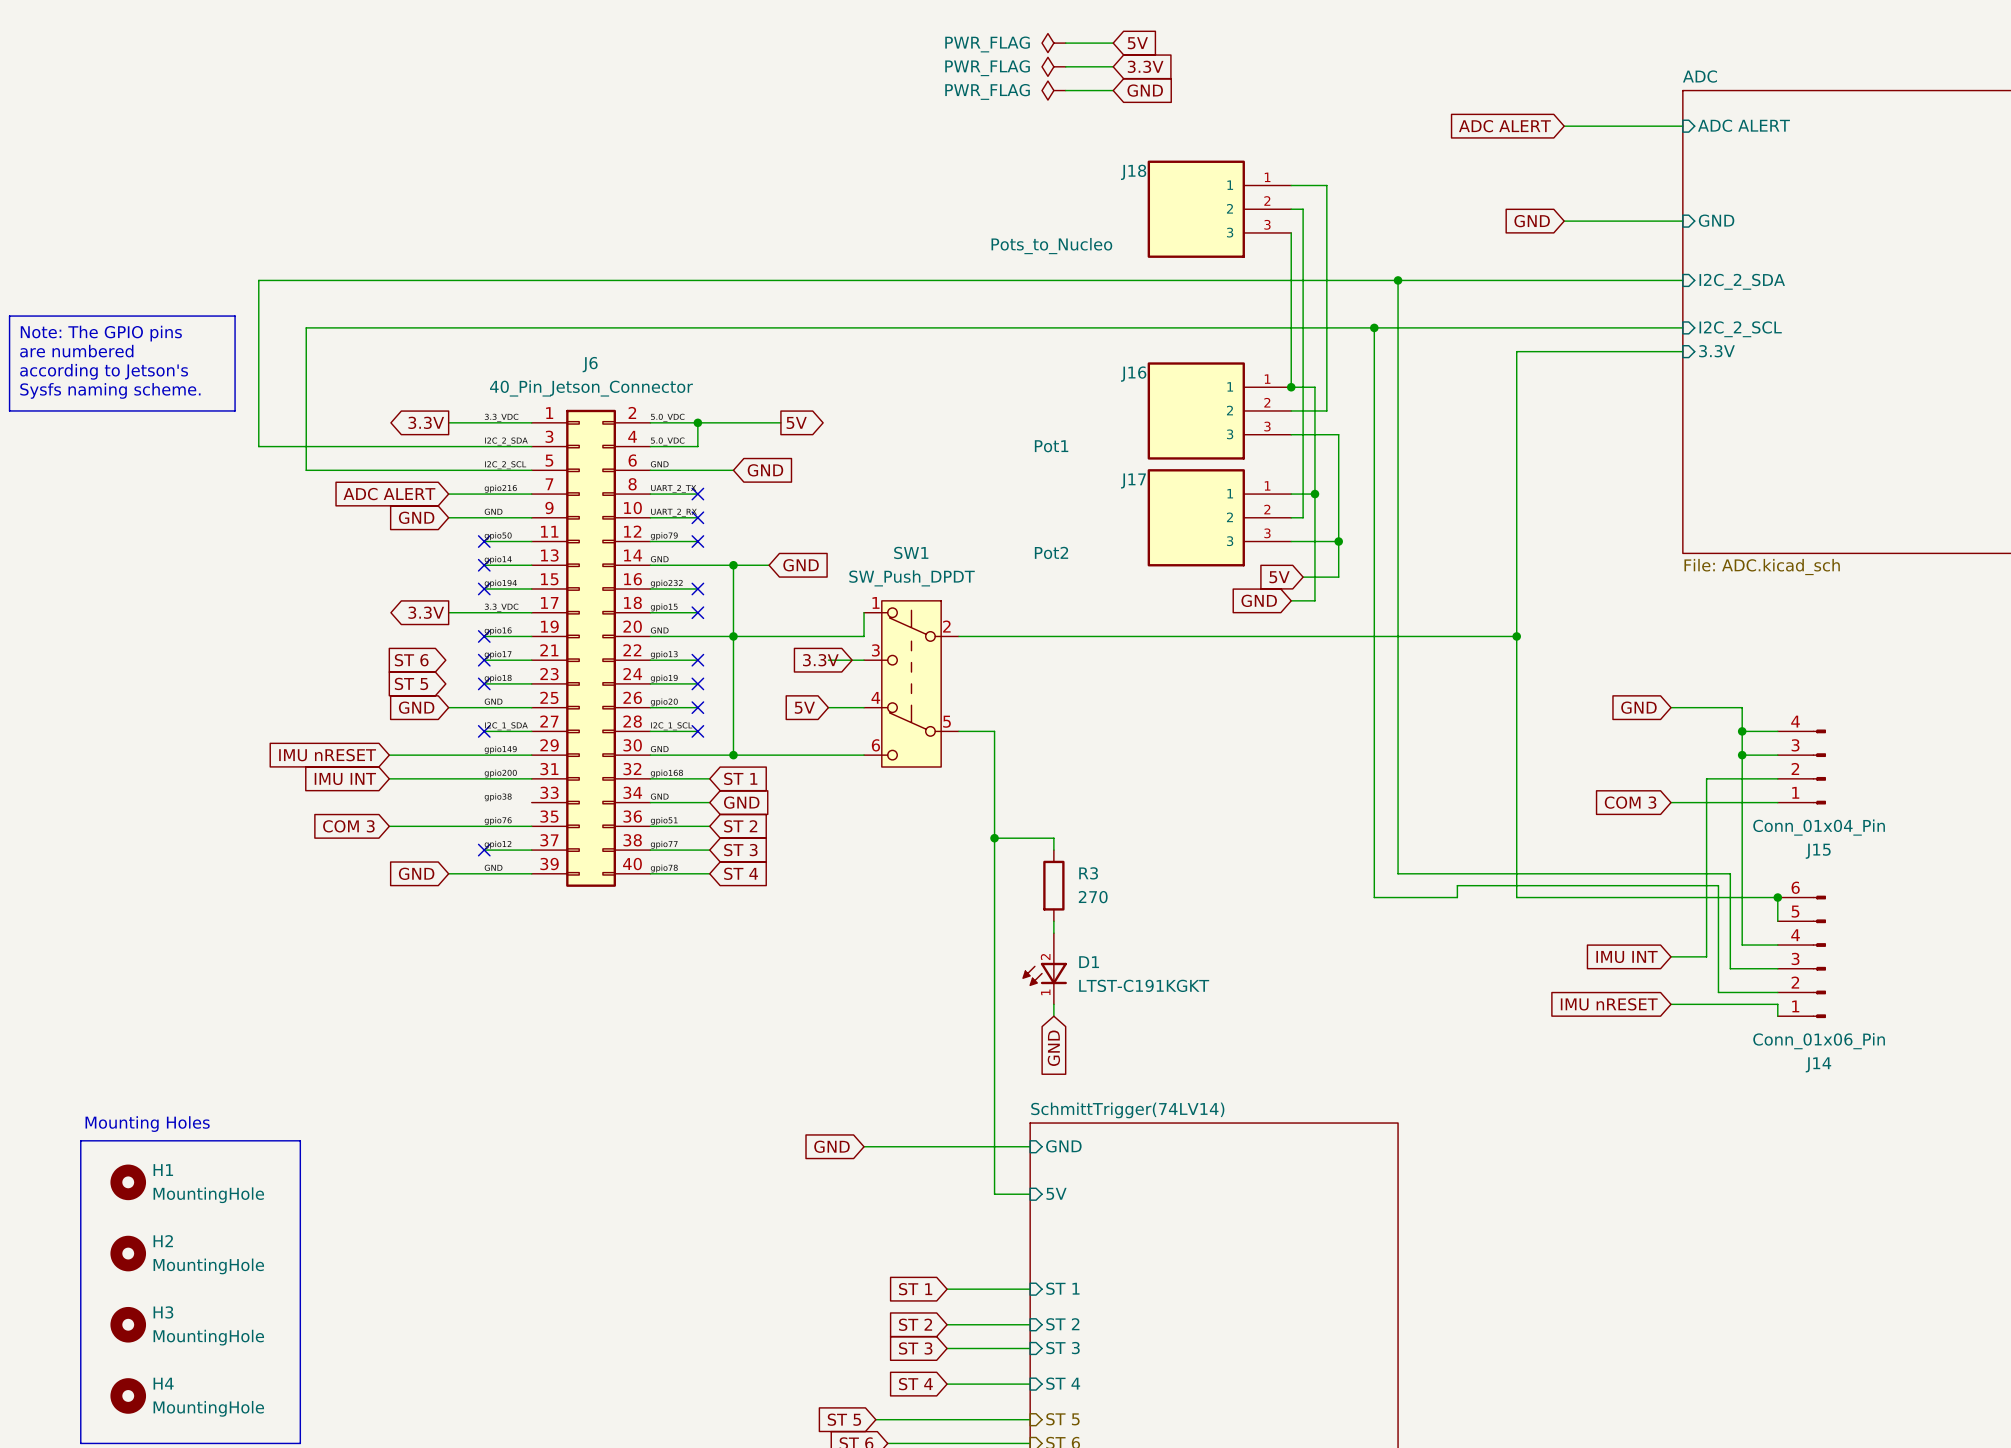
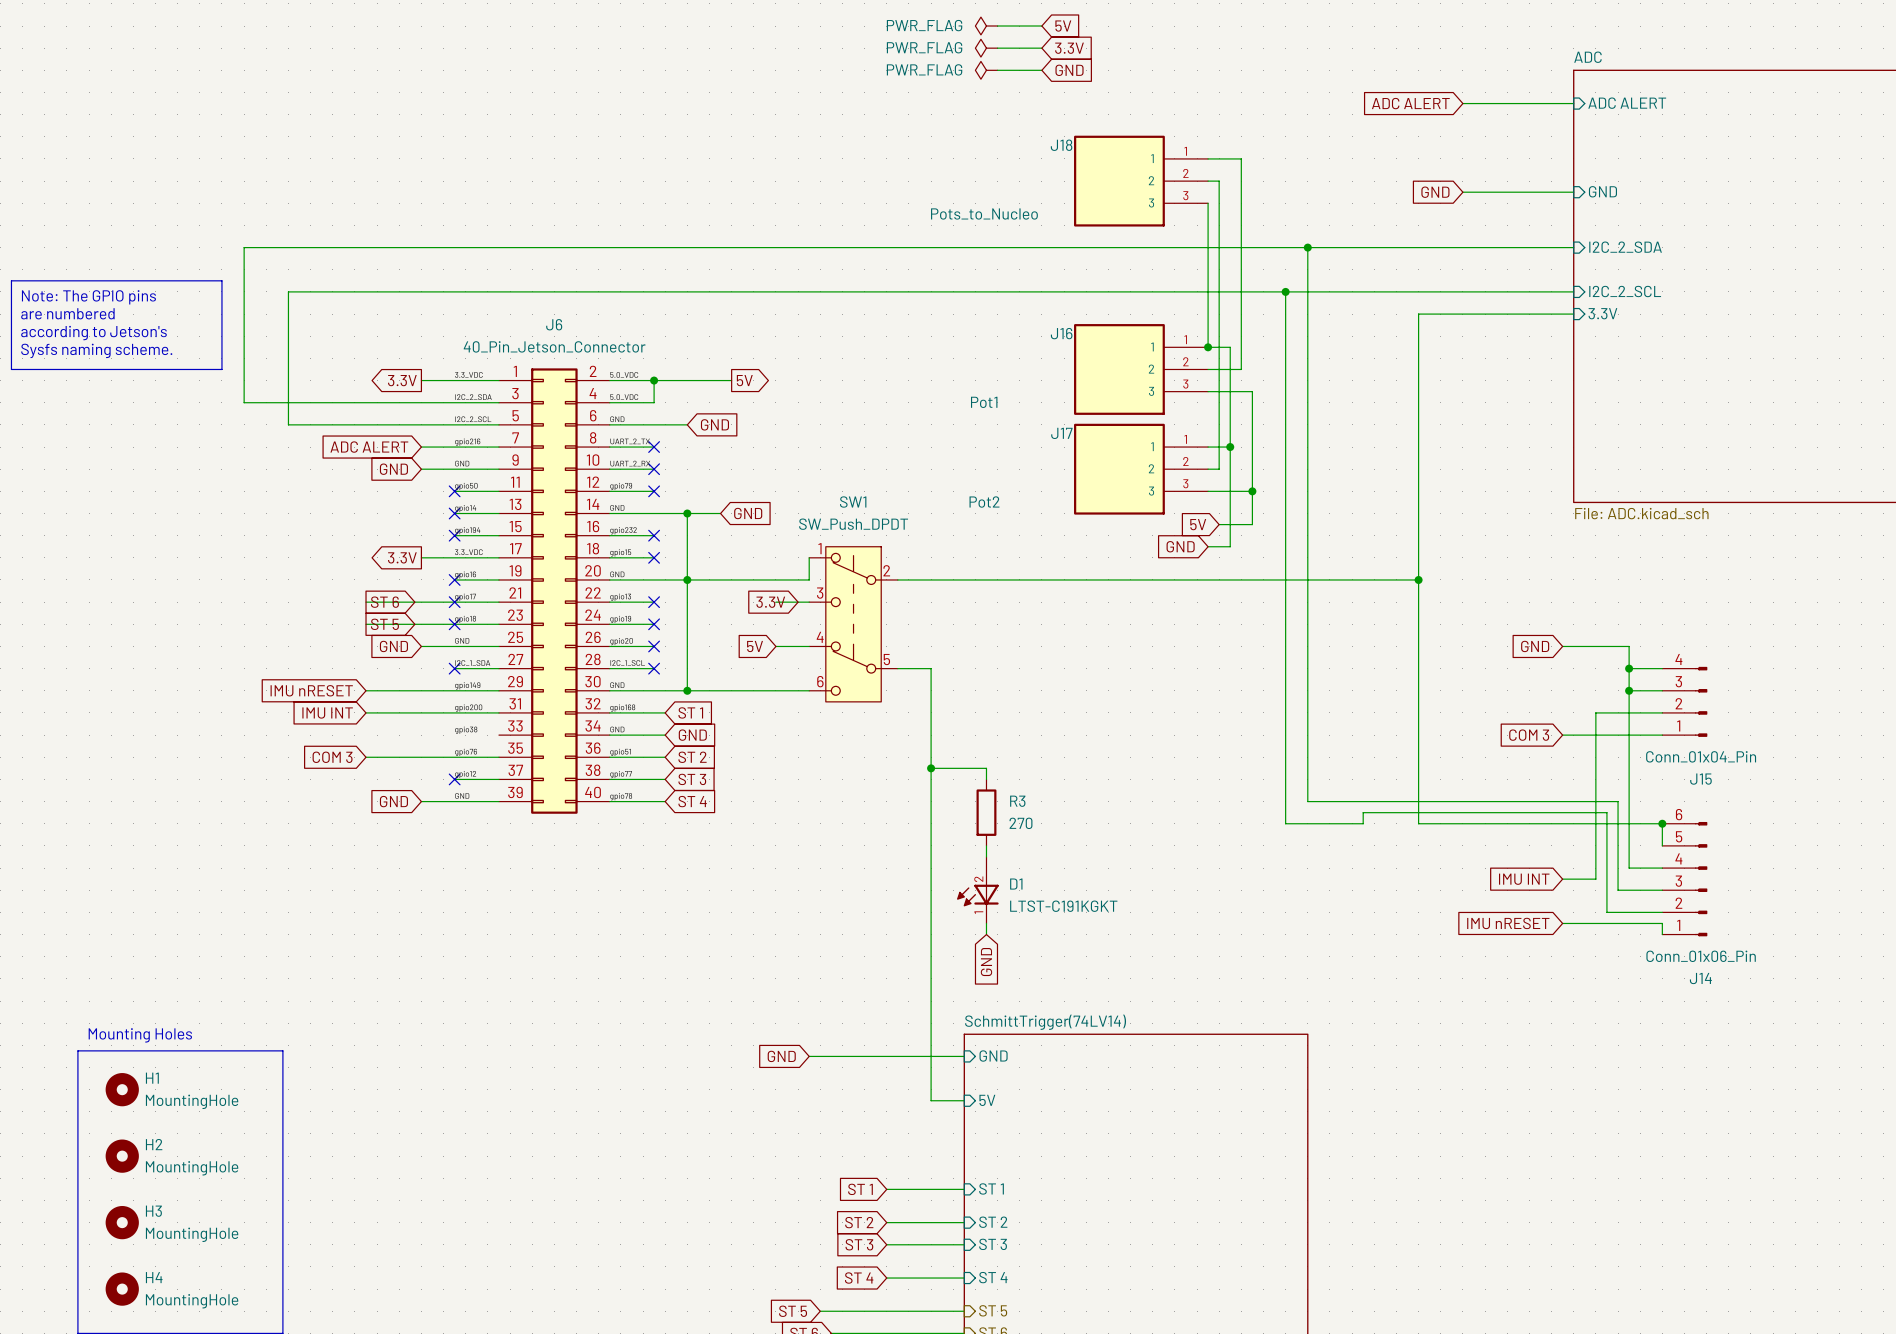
wire: none -> (366, 602) (454, 602)
wire: none -> (366, 624) (454, 624)

